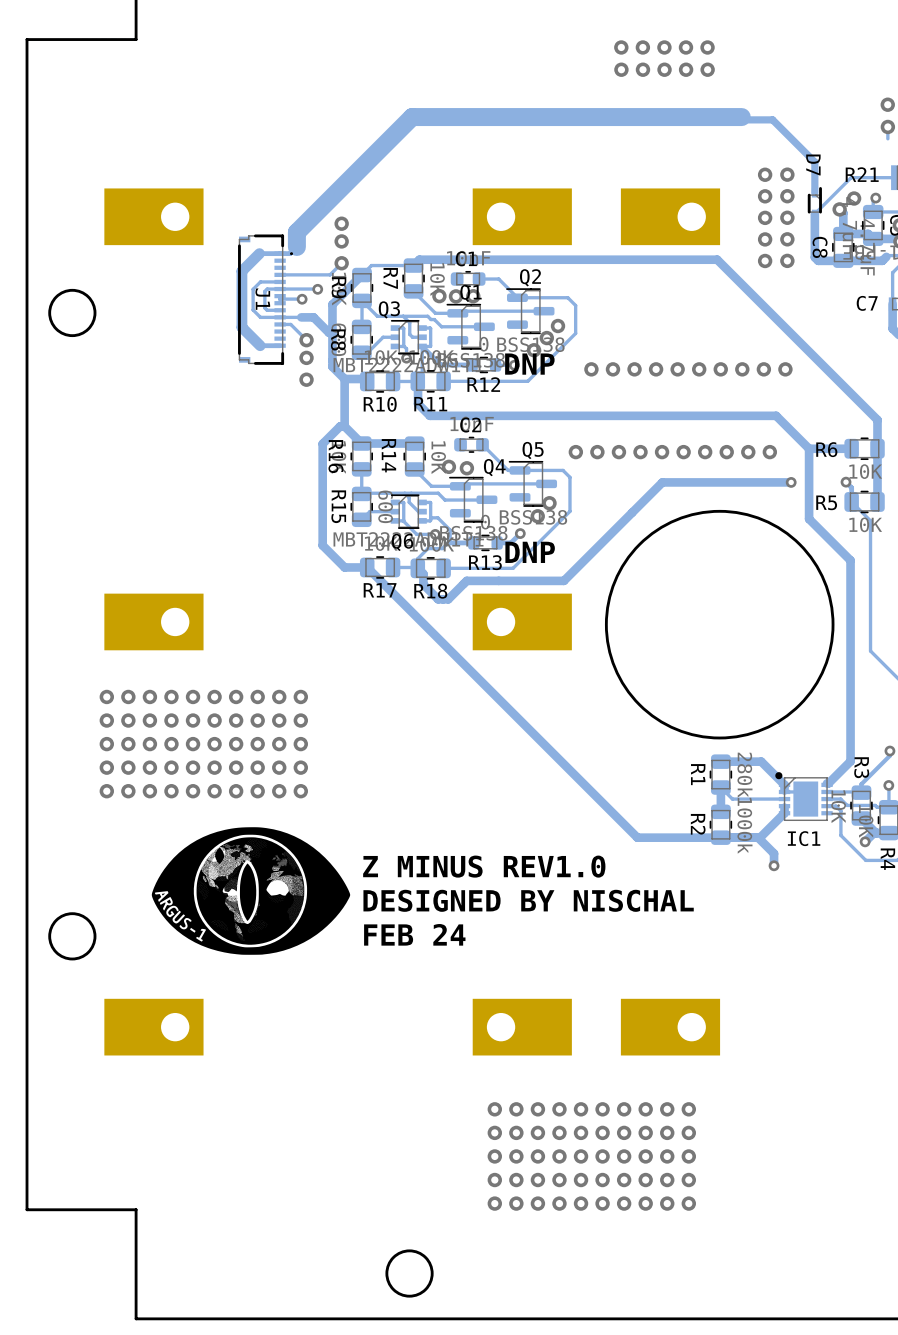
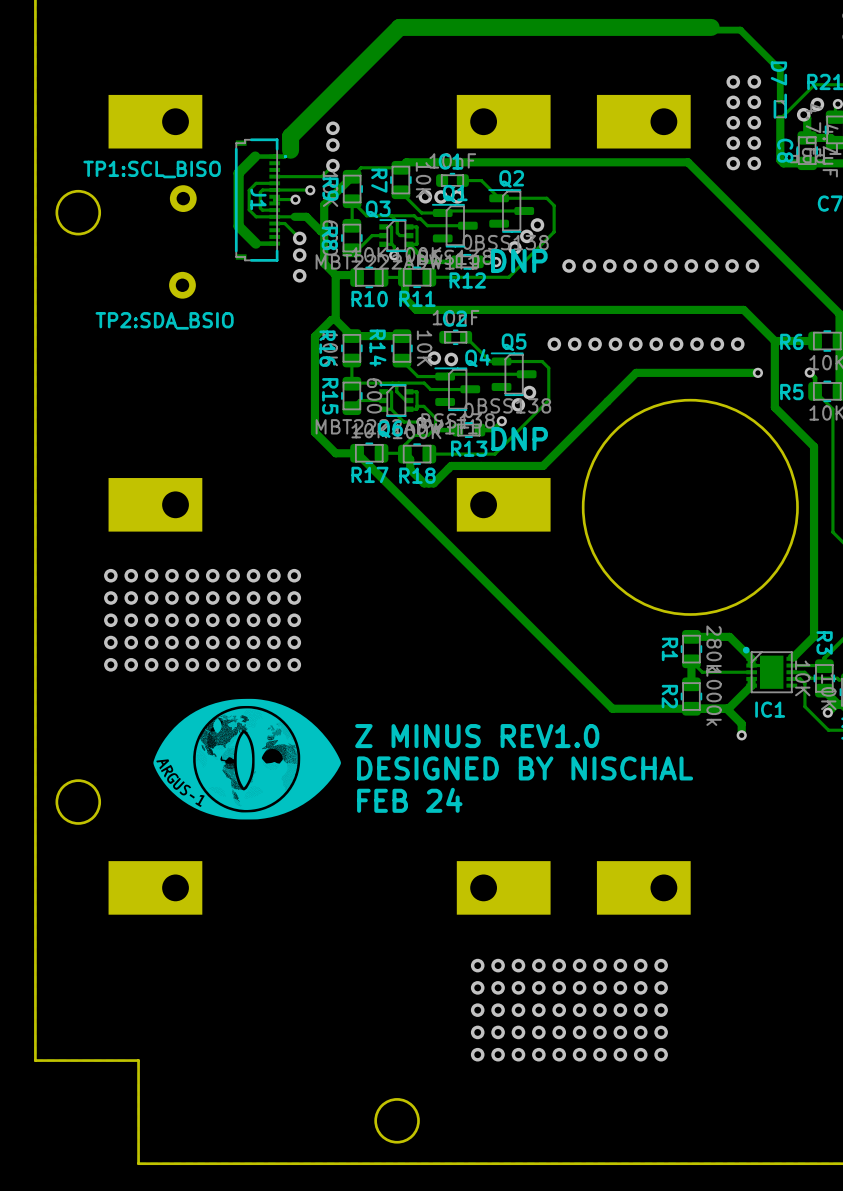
text: none -> TP1:SCL_BISO (152, 169)
part: none -> (183, 198)
part: none -> (182, 285)
text: none -> TP2:SDA_BSIO (164, 320)

